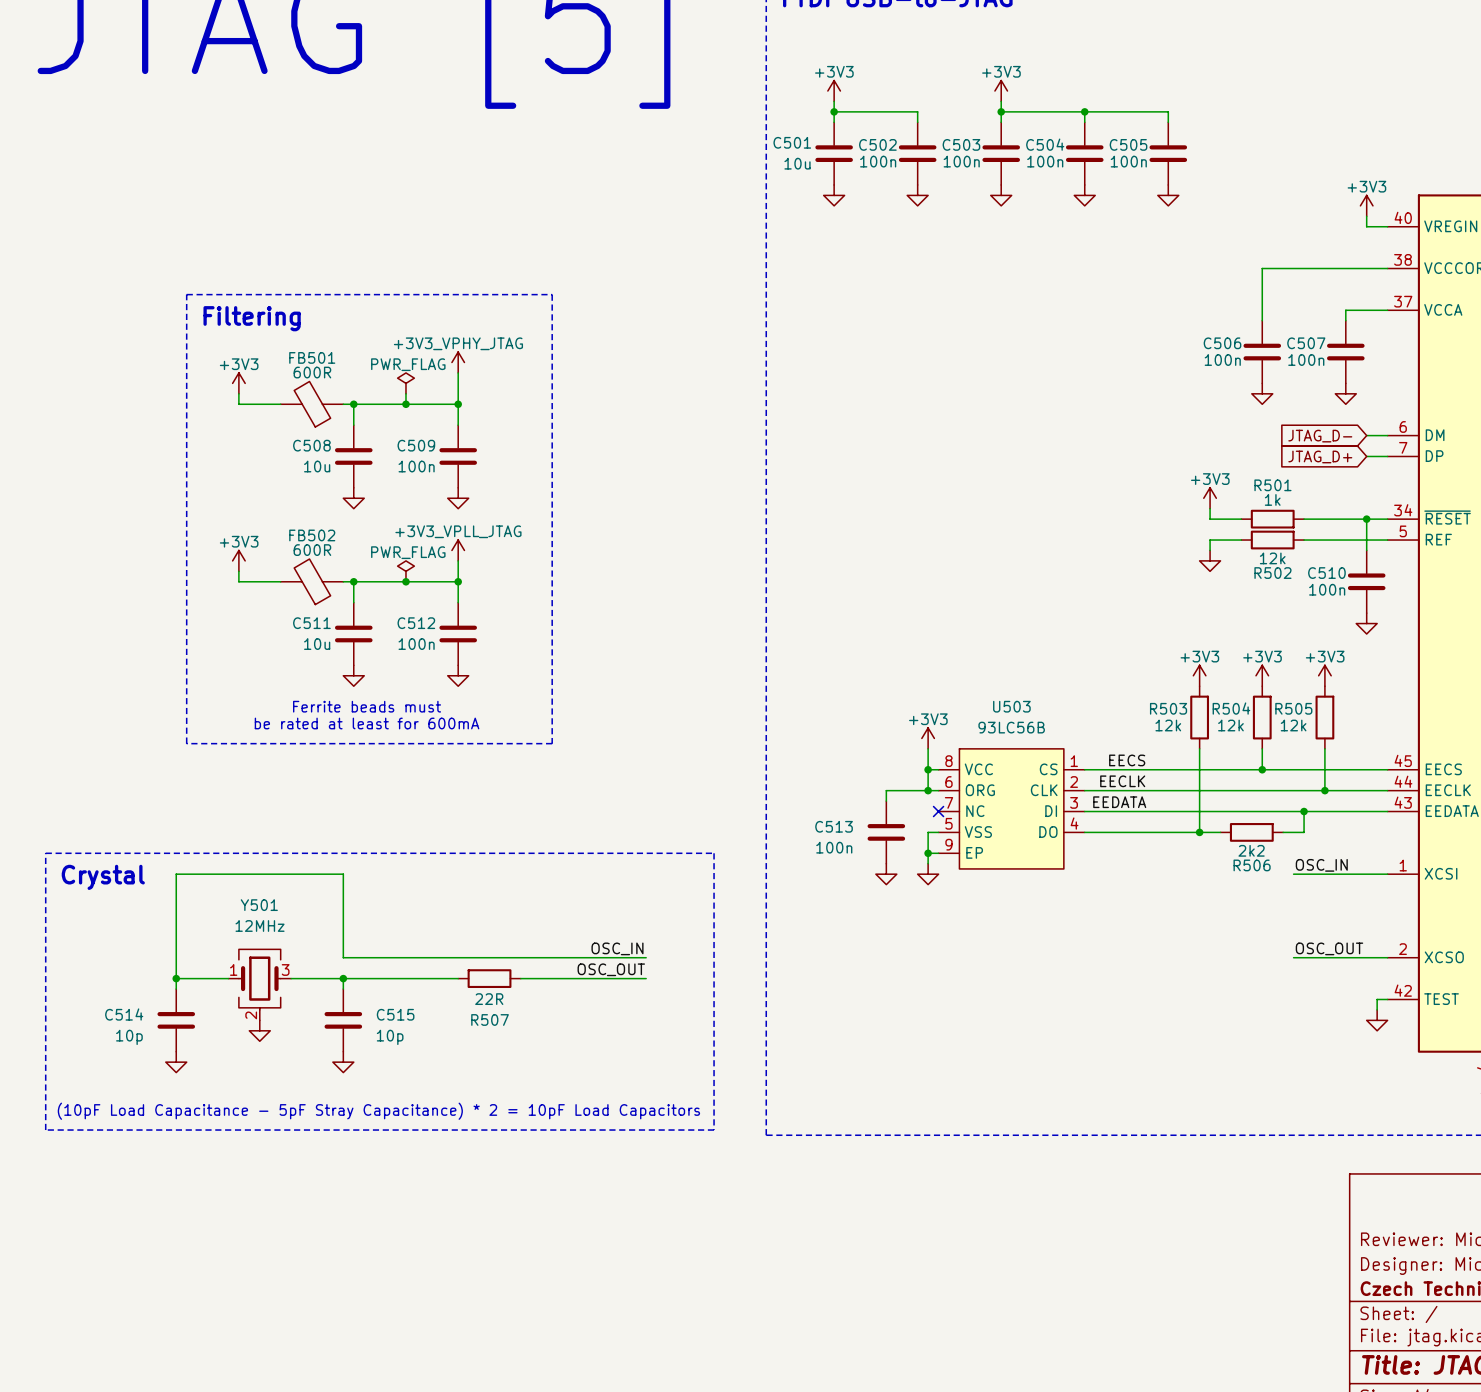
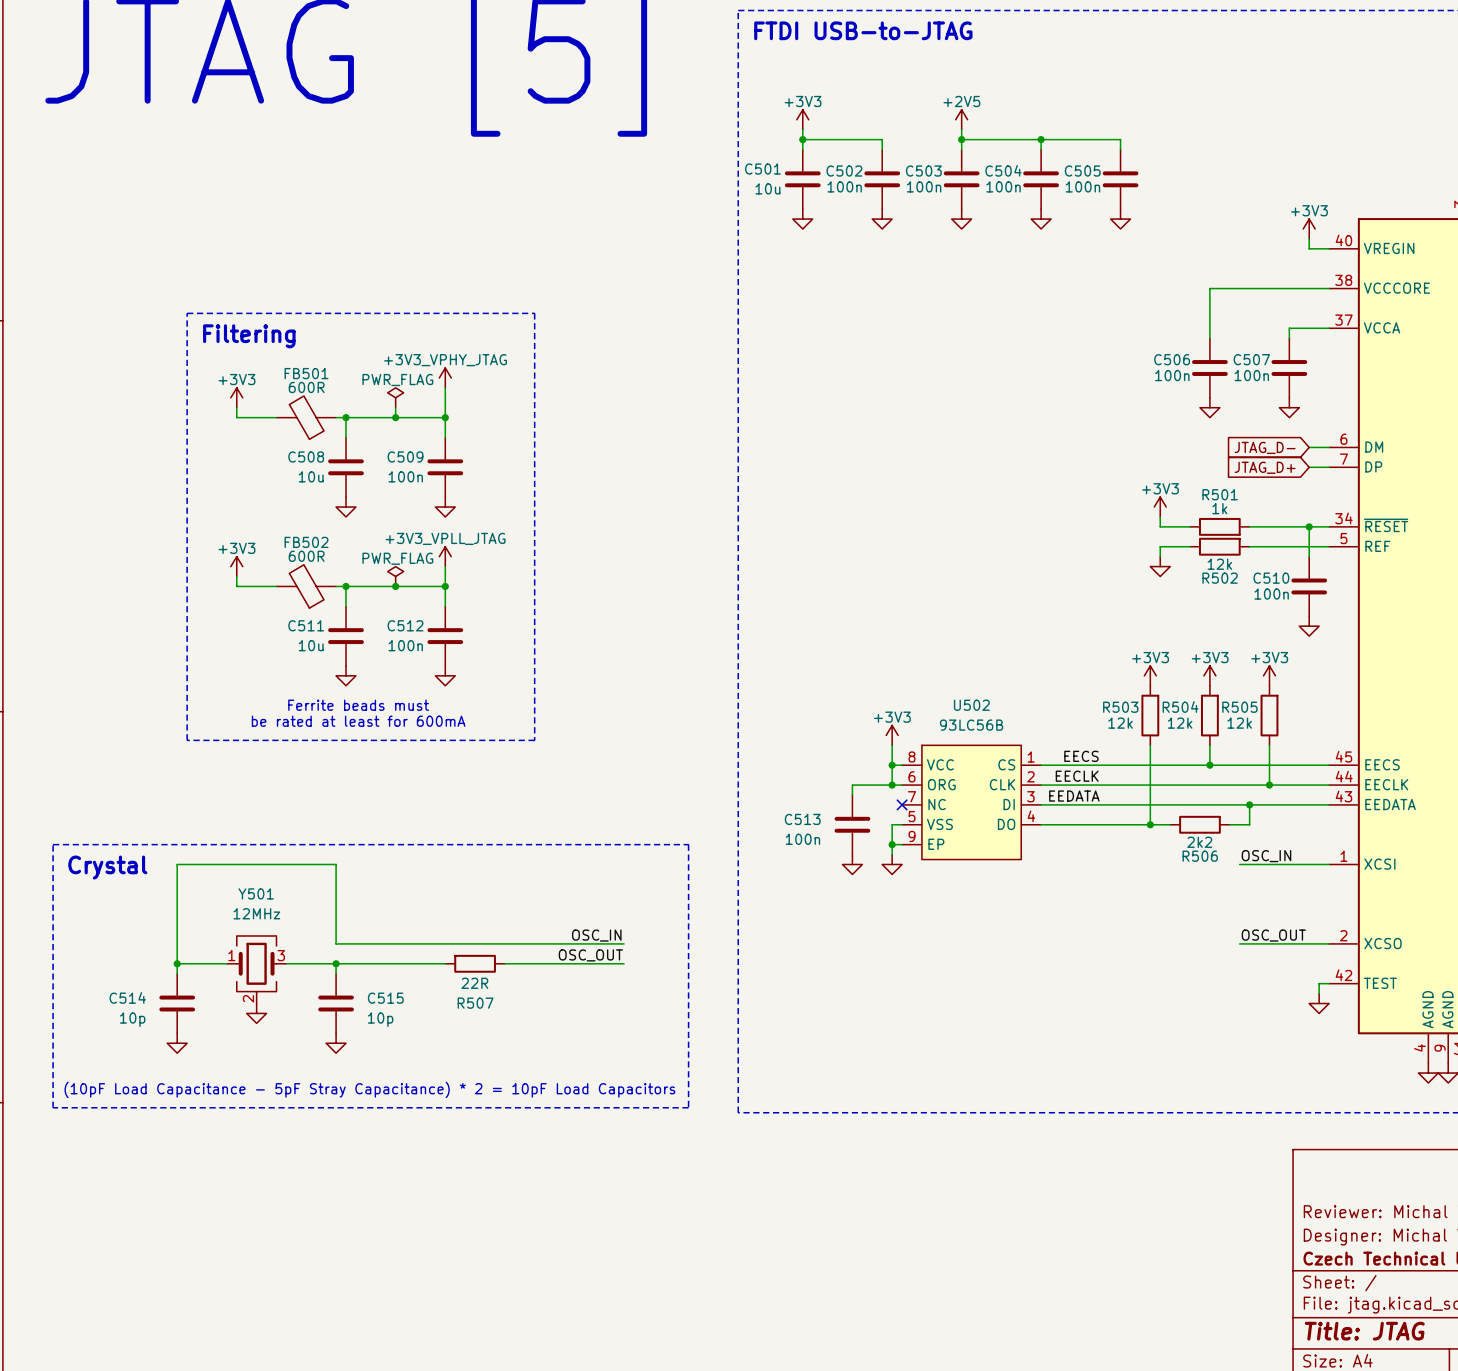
power symbol: +3V3 (1001, 90) -> +2V5 (961, 119)
U503 name: U503 (1011, 706) -> U502 (971, 705)

